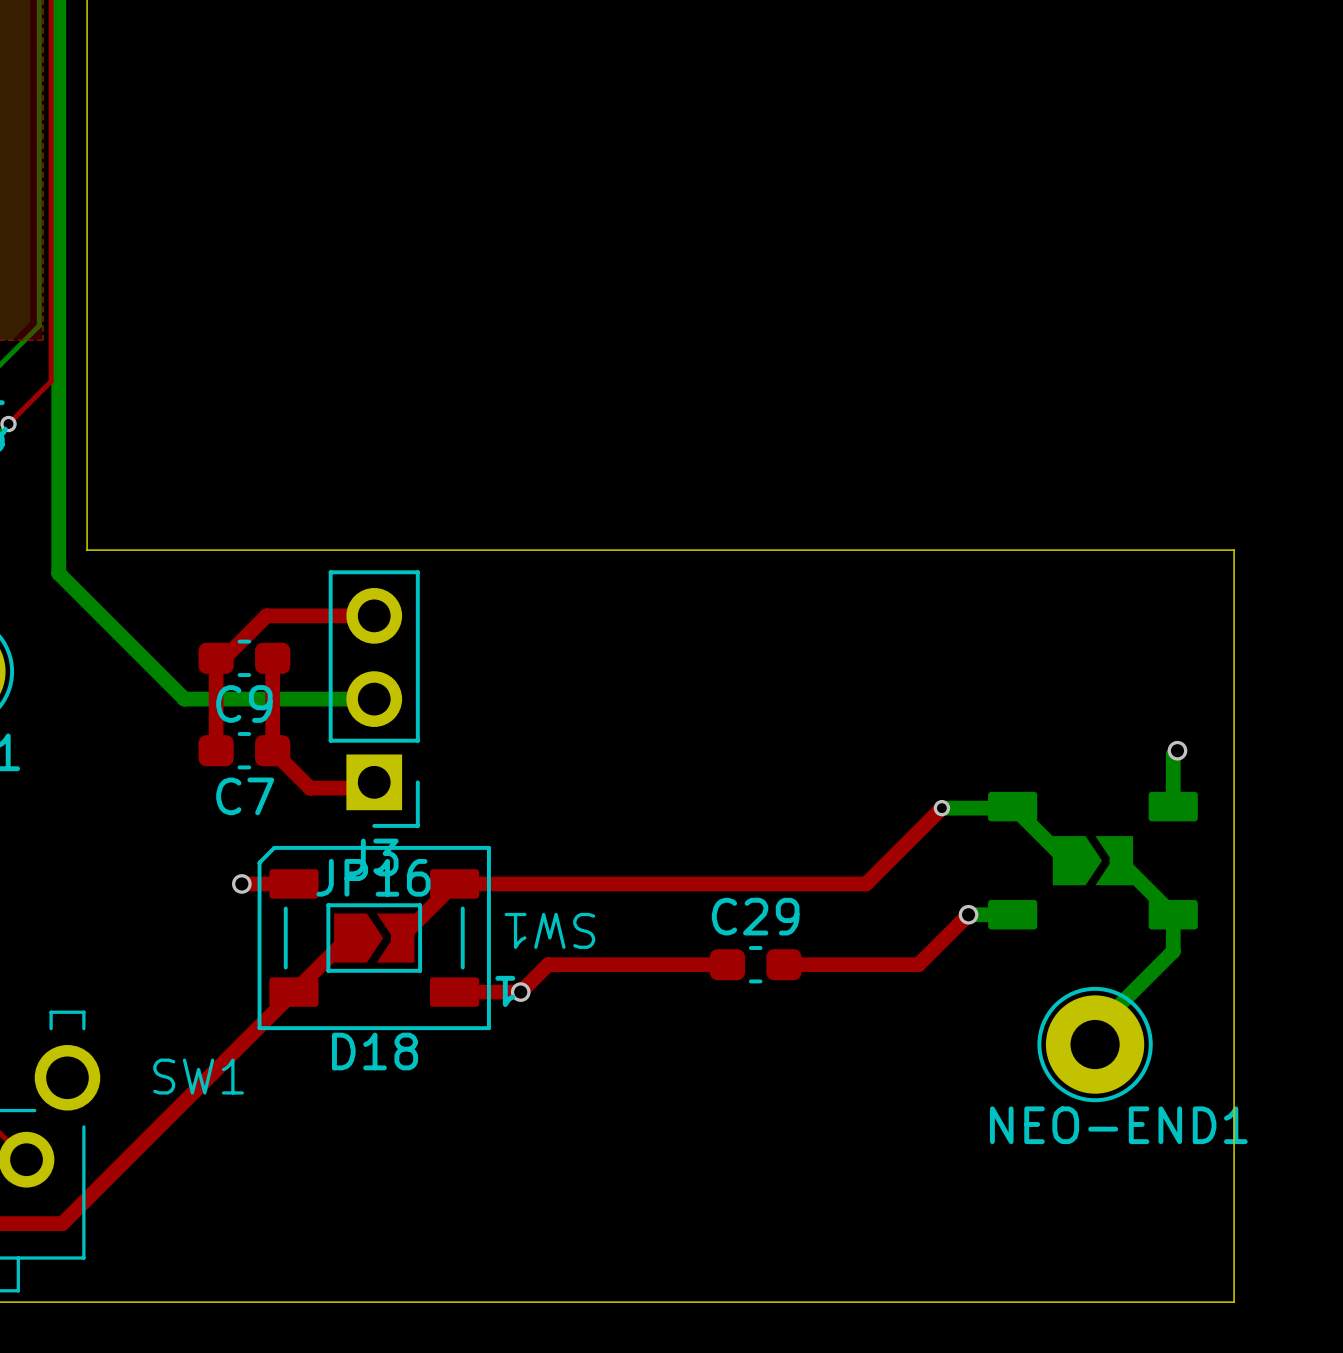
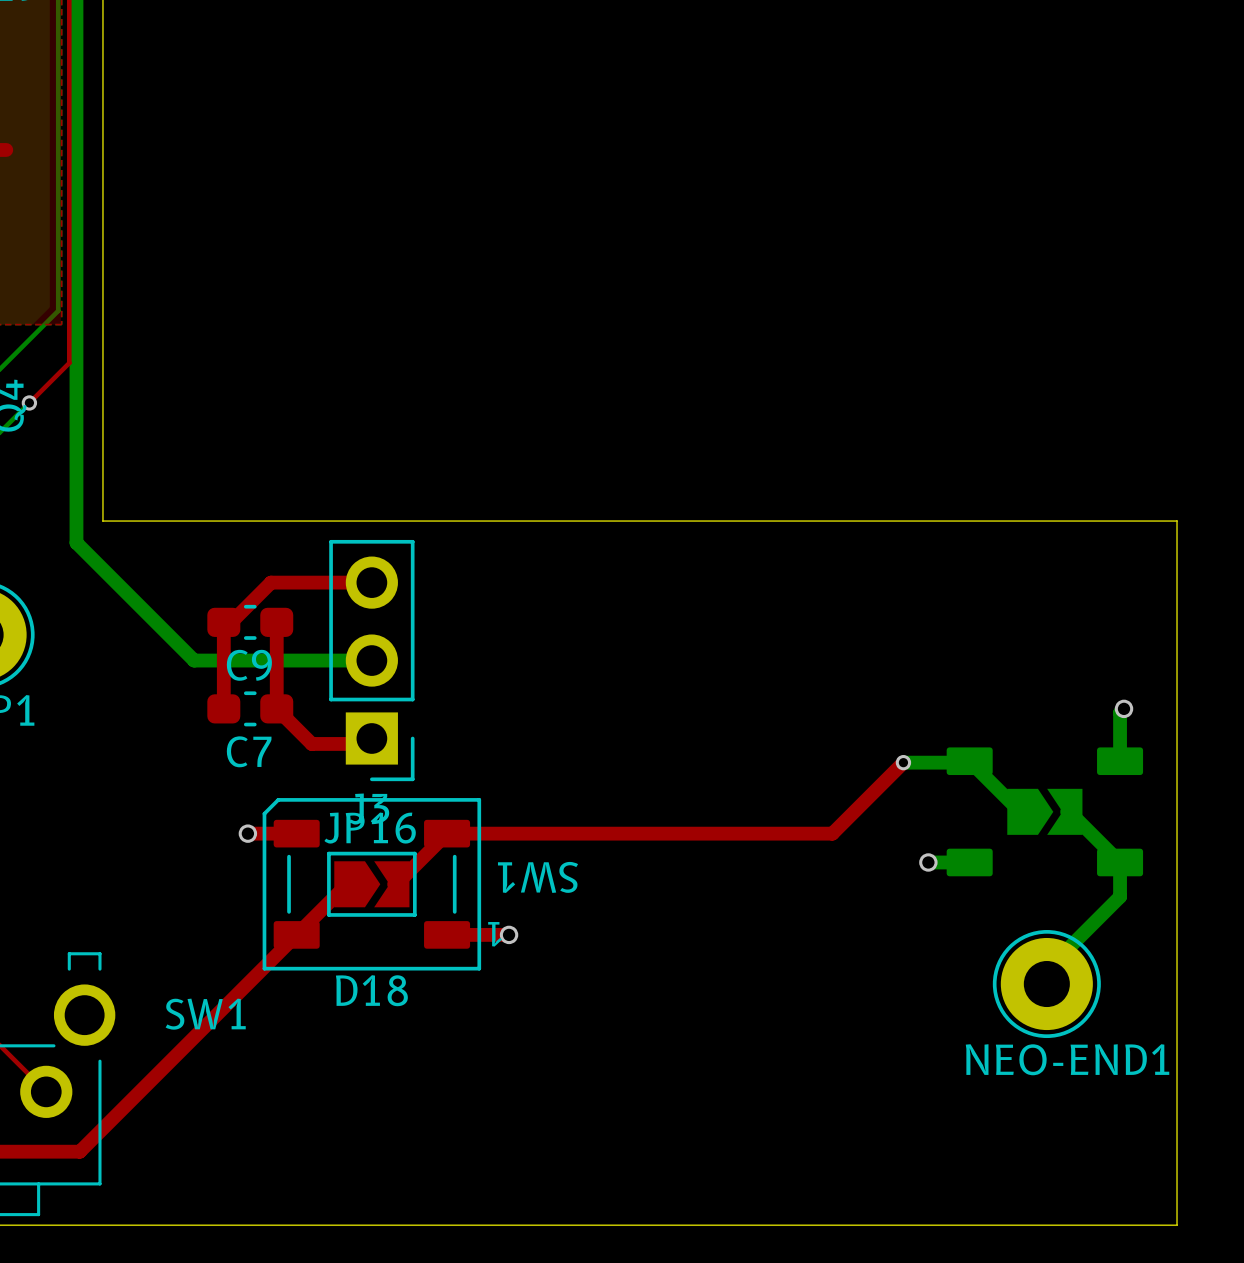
top track: (968, 914) (918, 964) (783, 964) -> none
top track: (727, 964) (548, 964) (520, 992) -> none
C29: (755, 964) -> none

